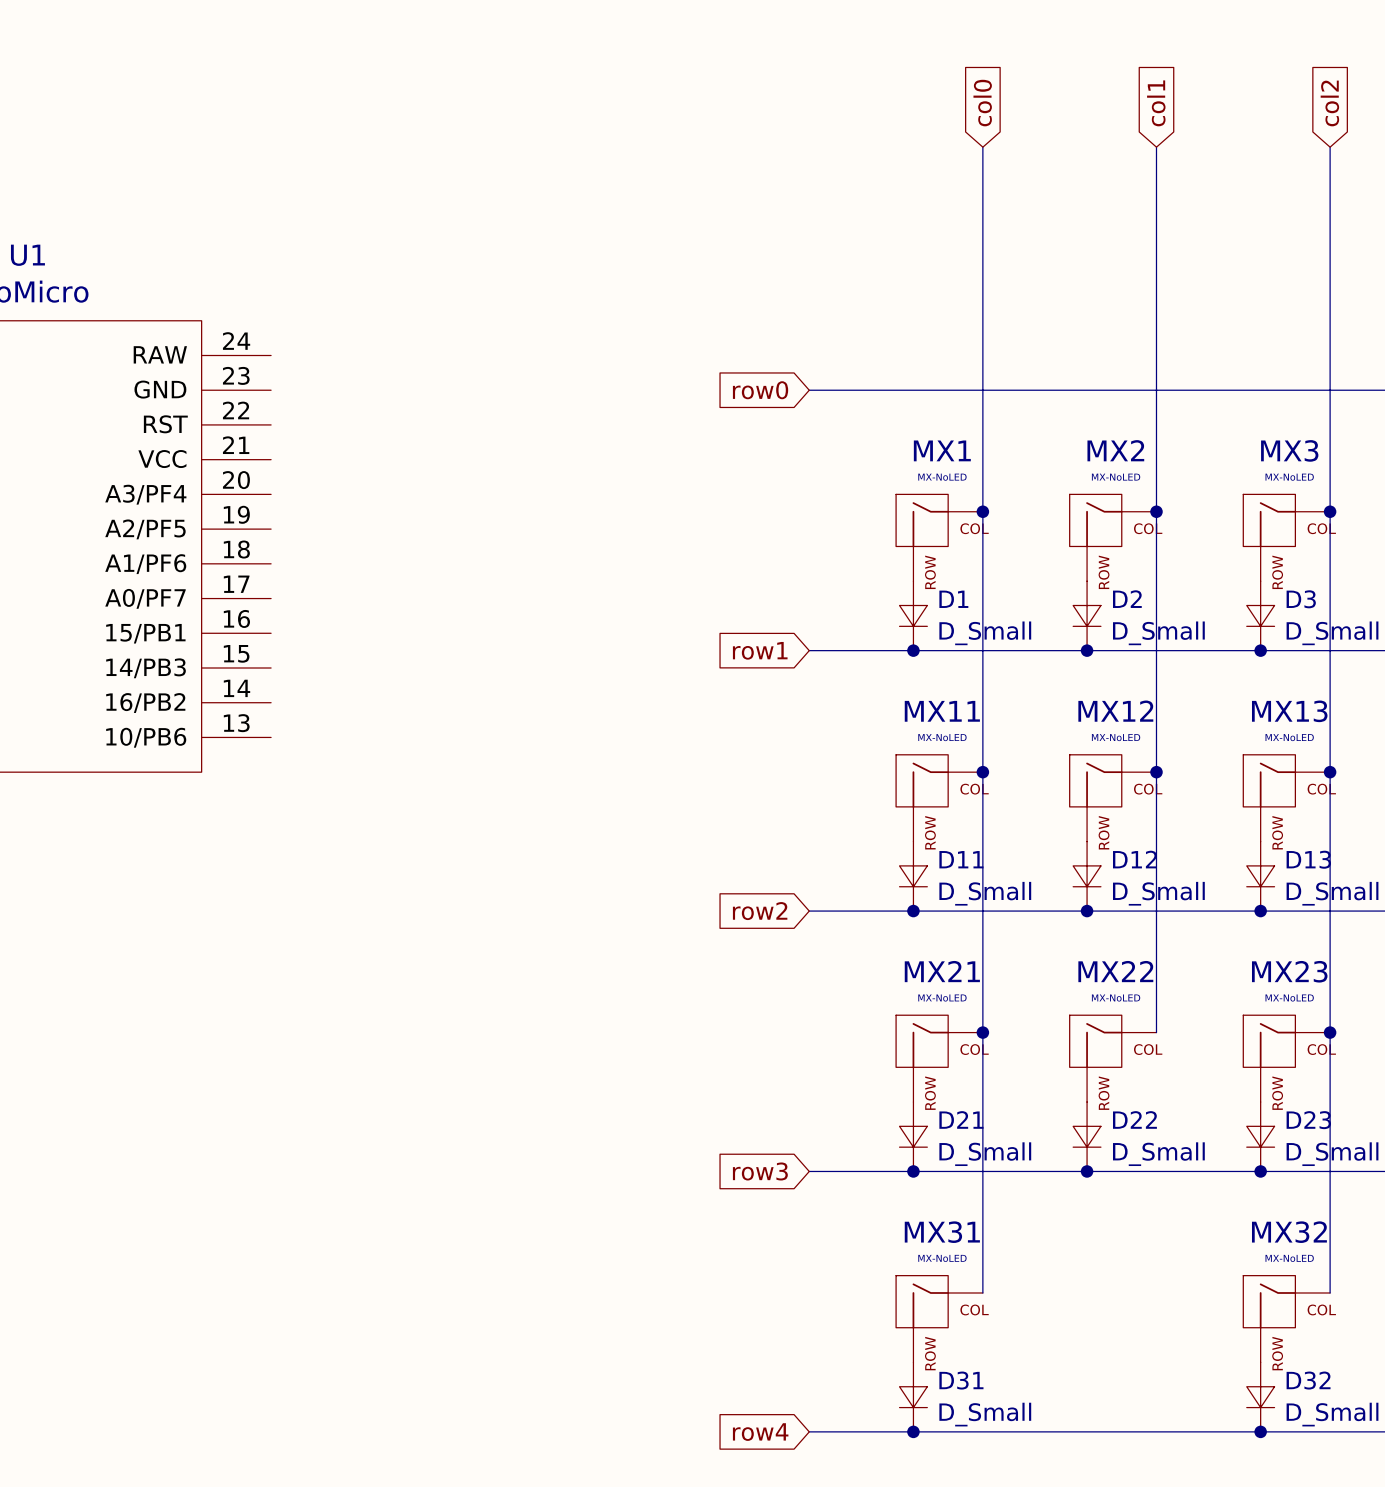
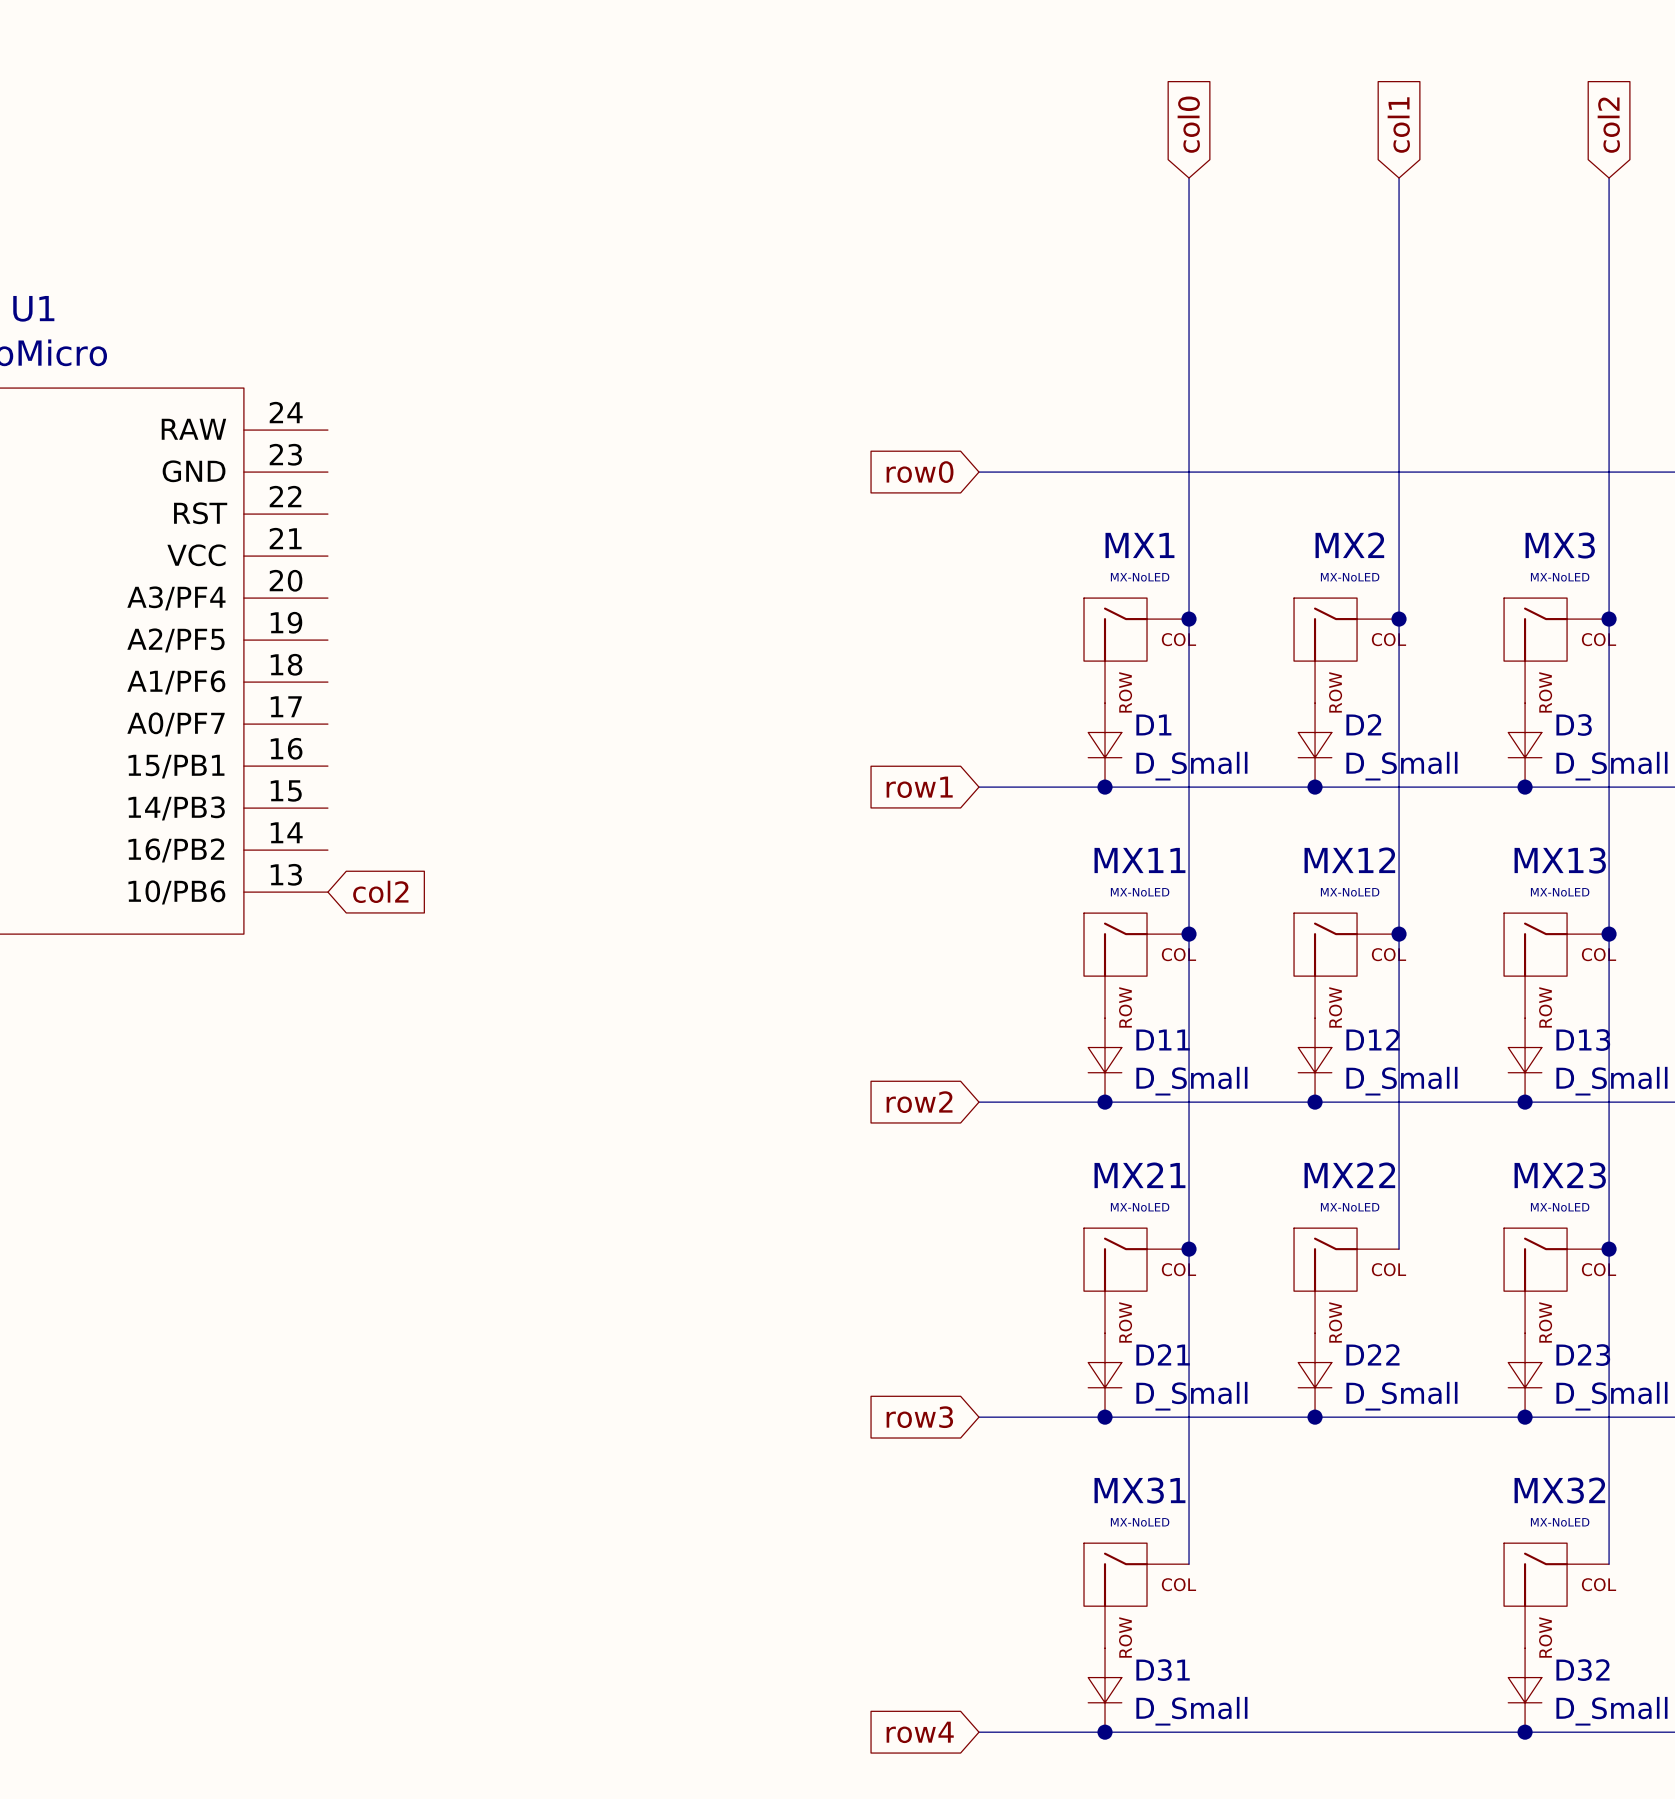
global label: none -> col2 (380, 891)

